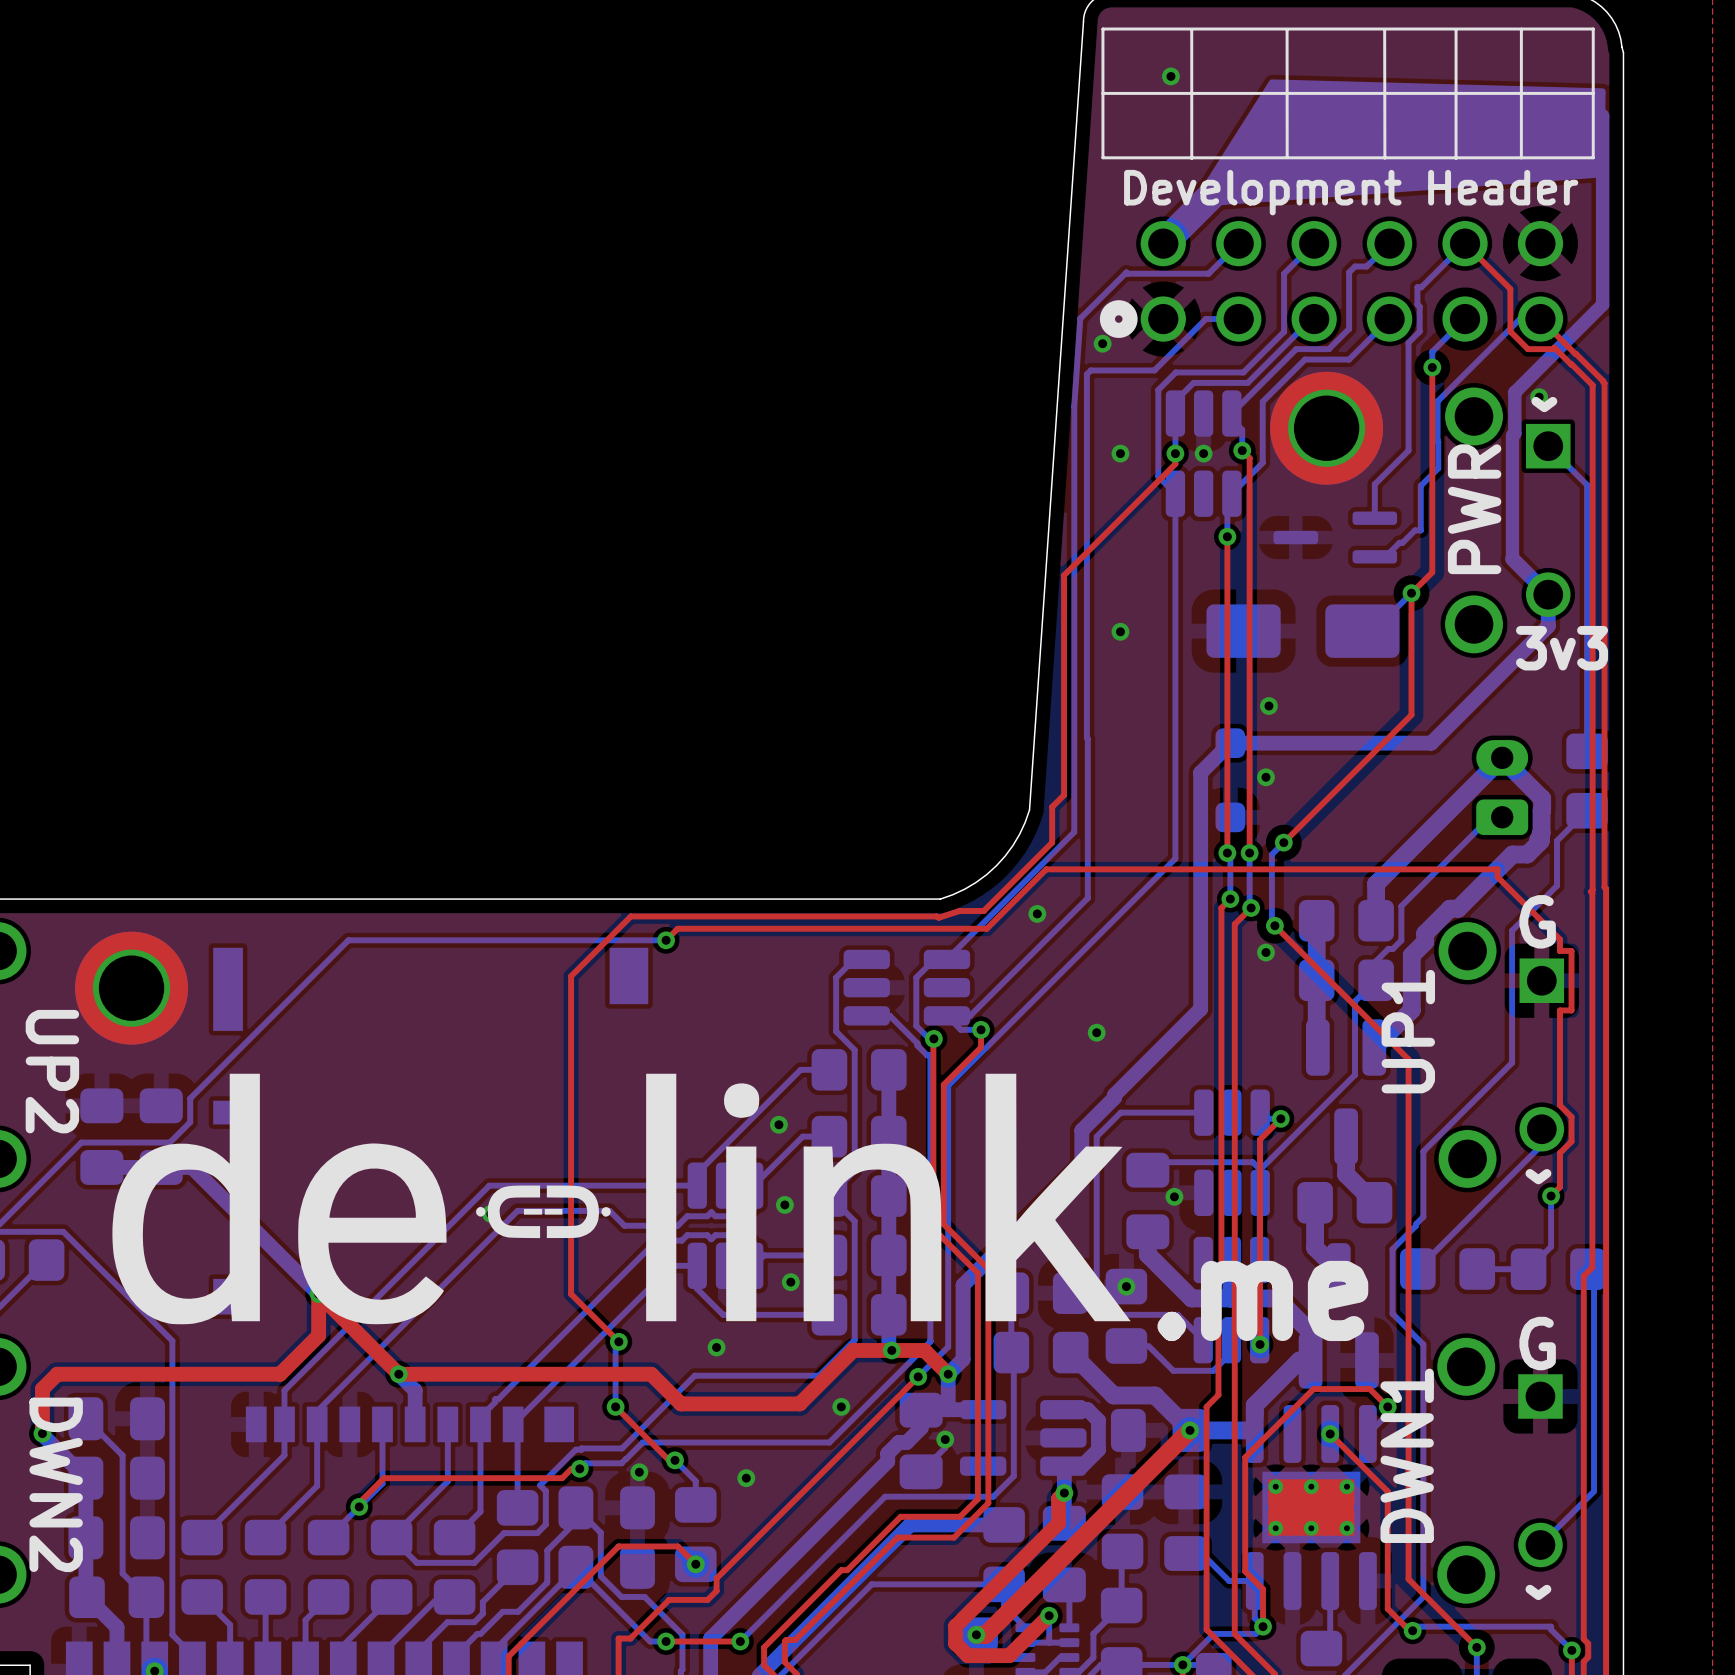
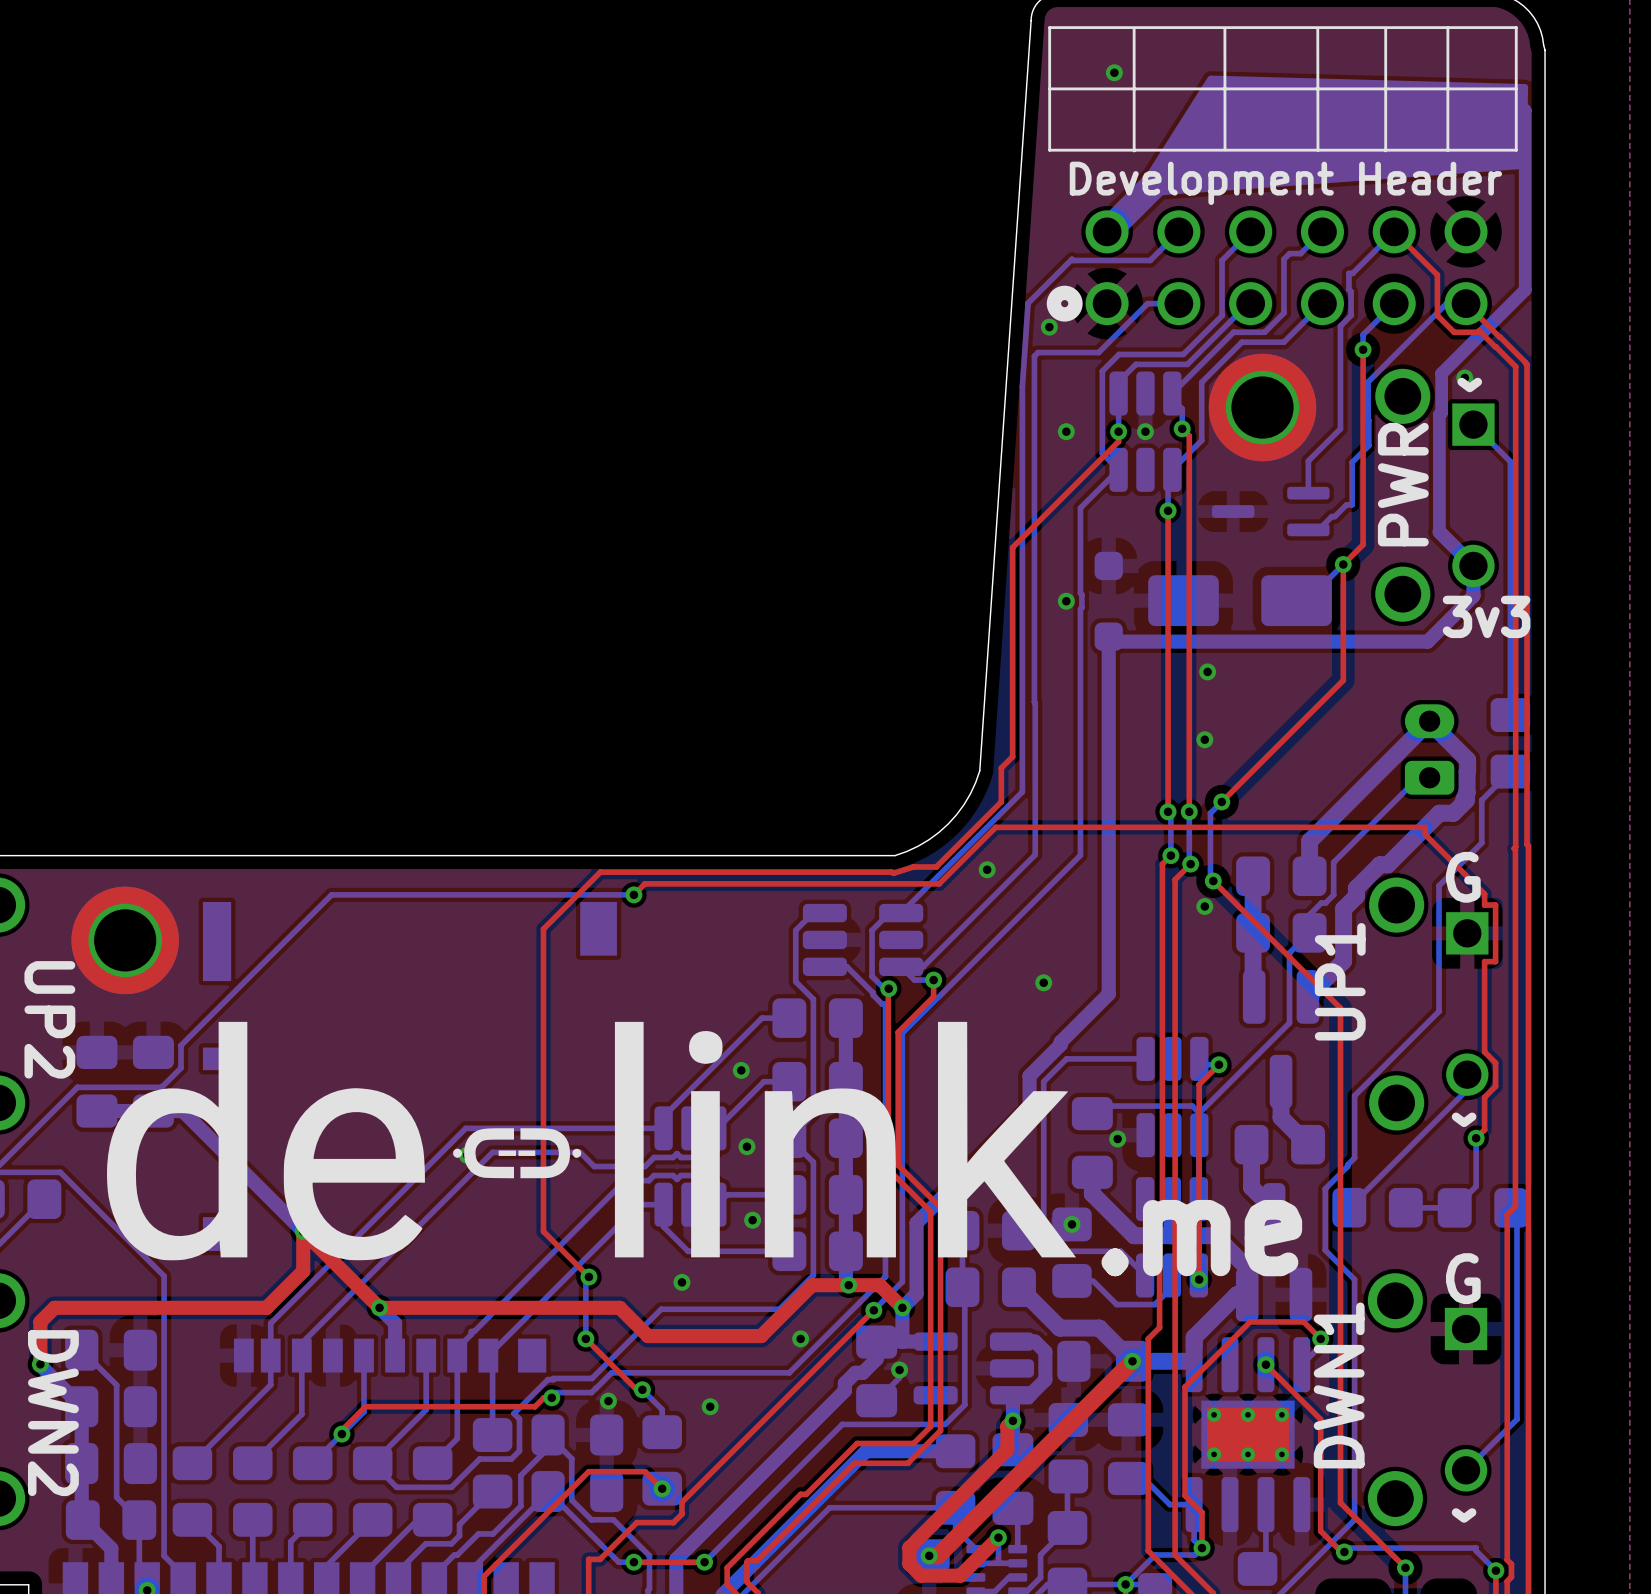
bottom track: (1175, 493) (1175, 858) (1135, 898) -> (1118, 469) (1080, 507) (1080, 855)
bottom track: (1500, 674) (1431, 743) (1230, 743) (1200, 772) (1200, 1008) (1165, 1044) -> (1427, 641) (1113, 641) (1108, 636) (1108, 994)
part position: (1230, 780) -> (1108, 601)

